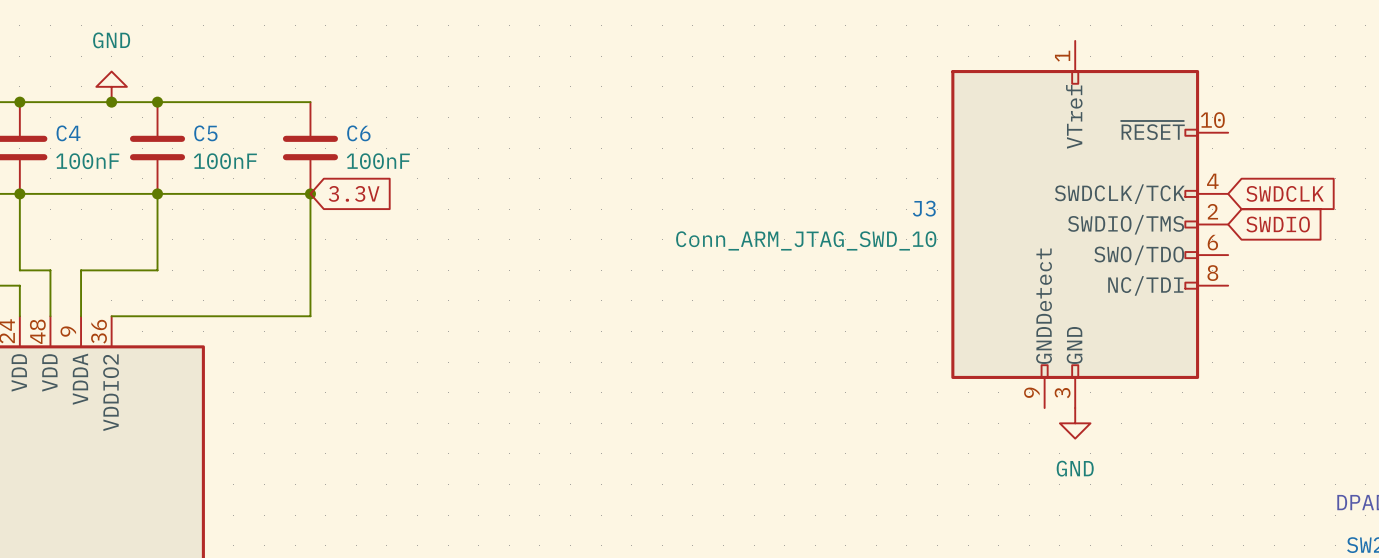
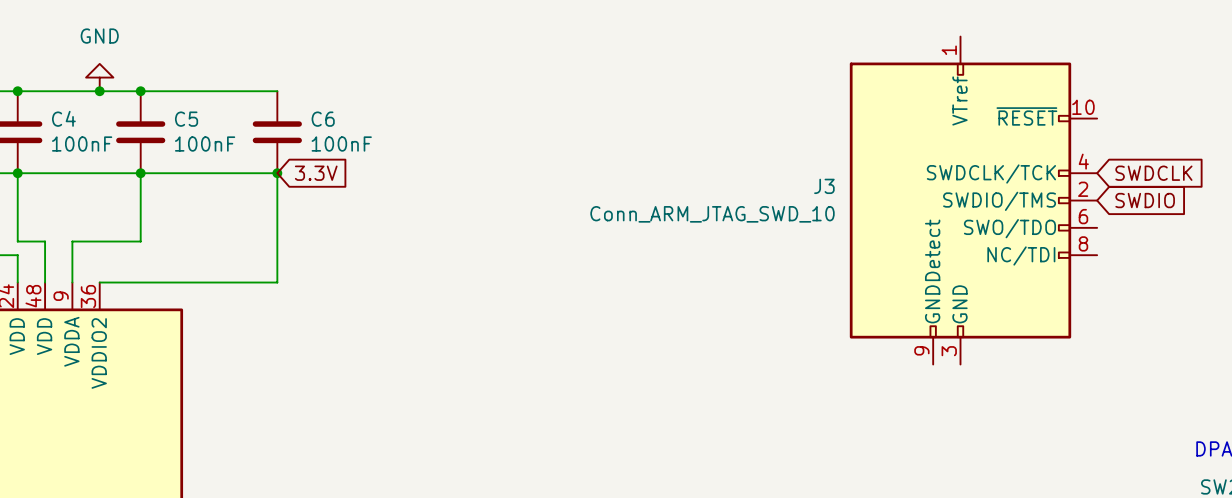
power symbol: GND (1075, 423) -> none

